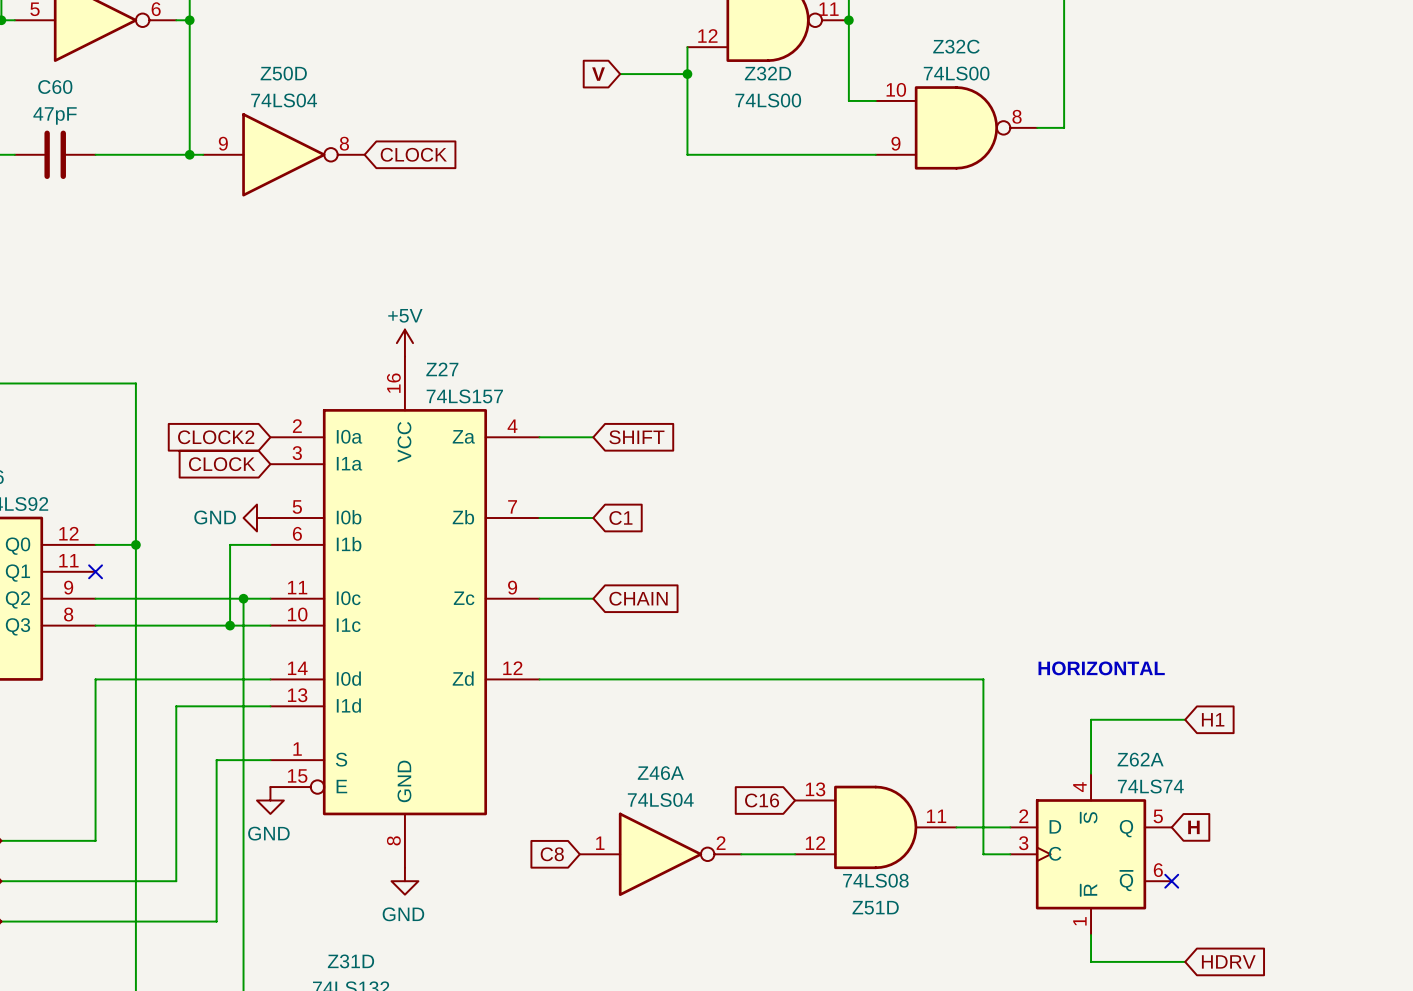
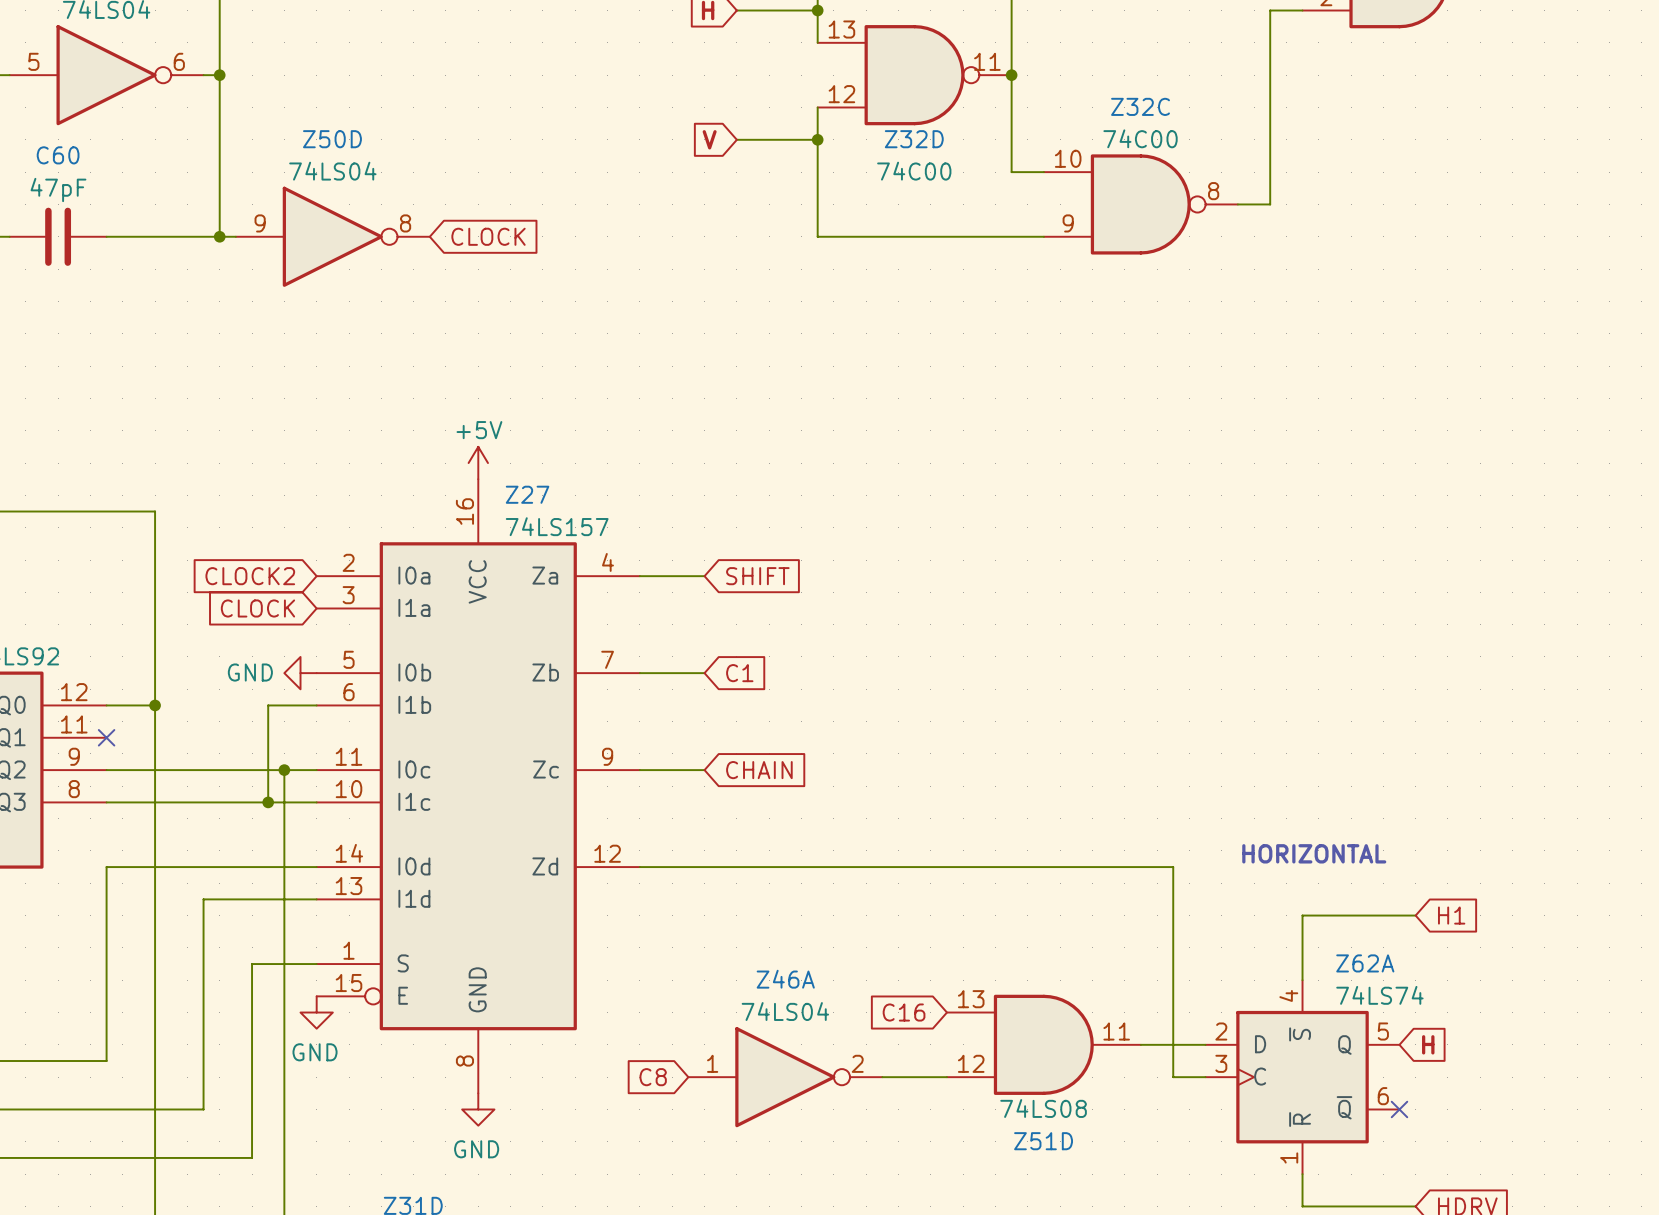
Z32C value: 74LS00 (956, 73) -> 74C00 (1140, 138)
Z32D value: 74LS00 (768, 100) -> 74C00 (914, 171)

